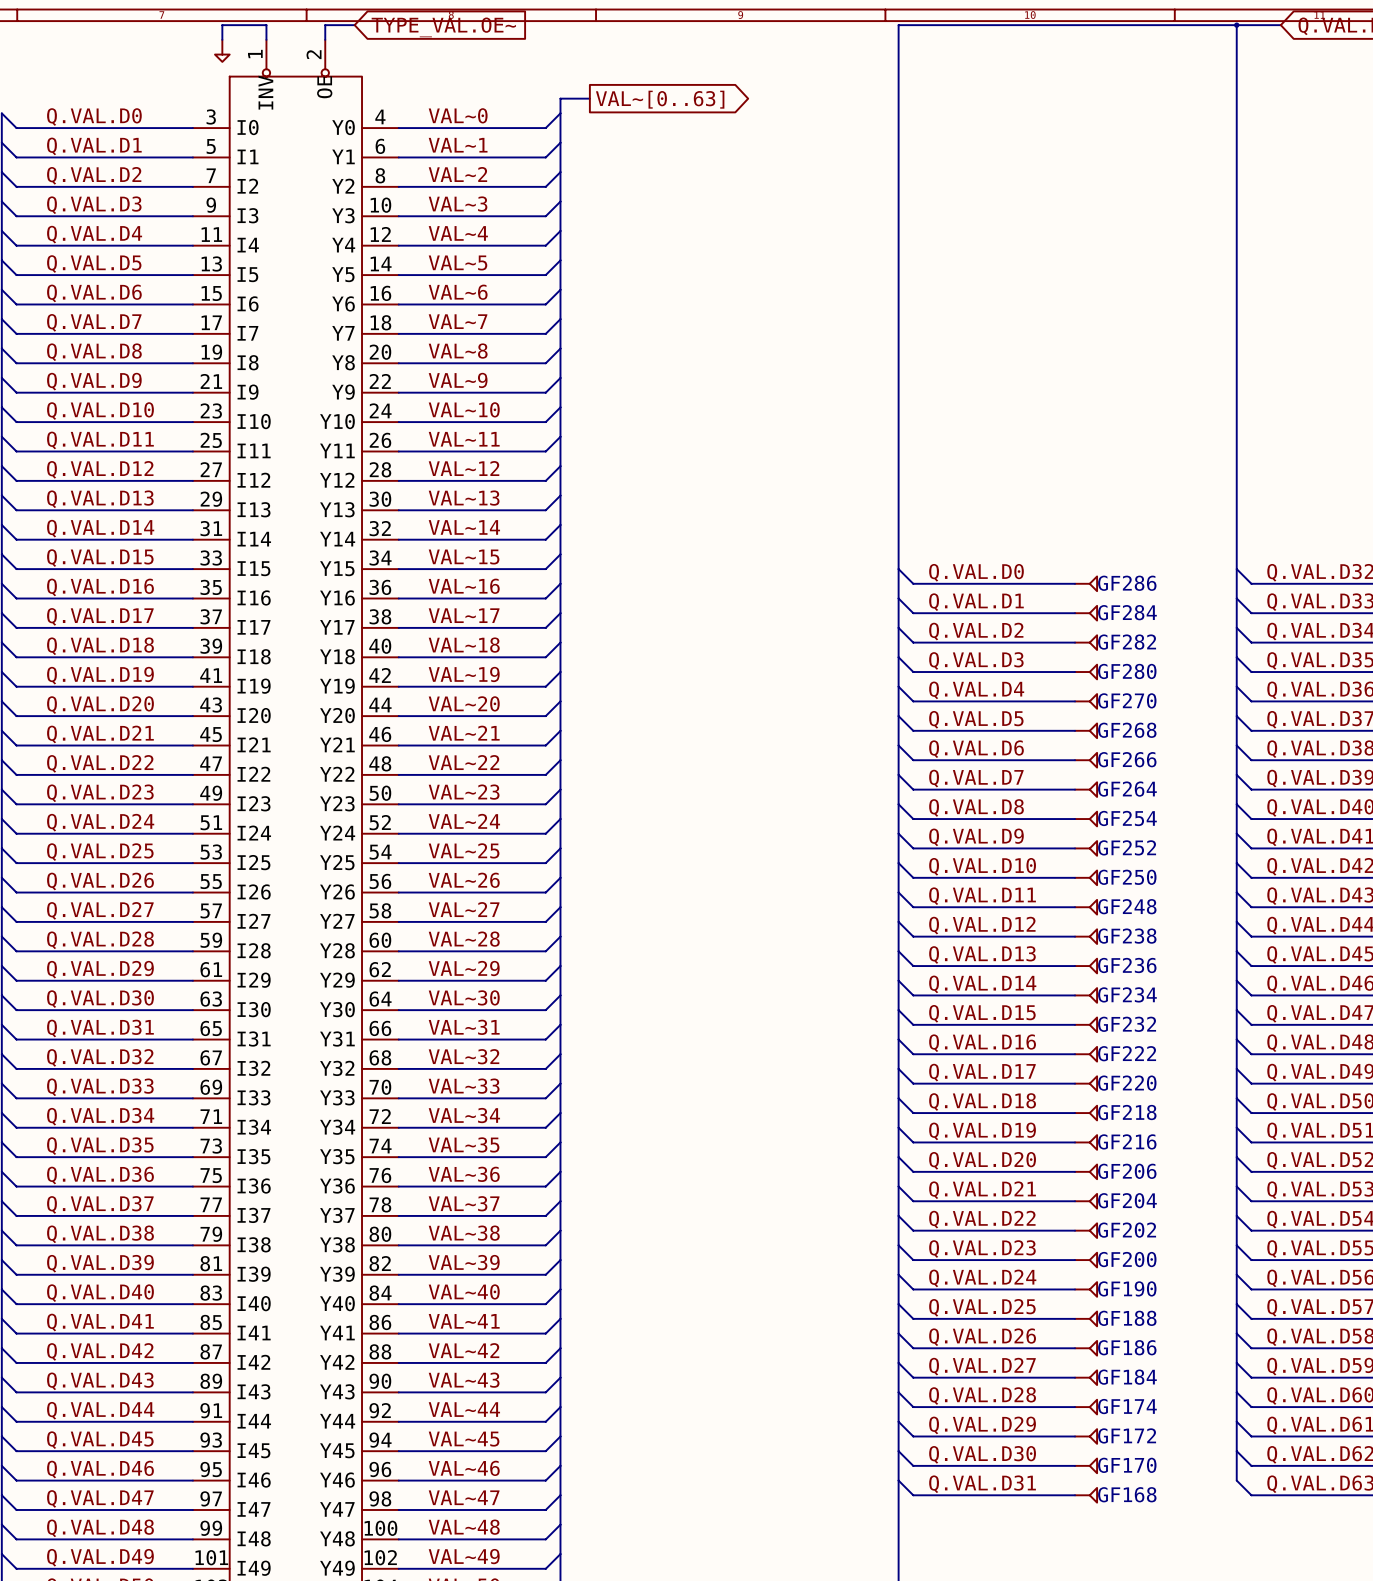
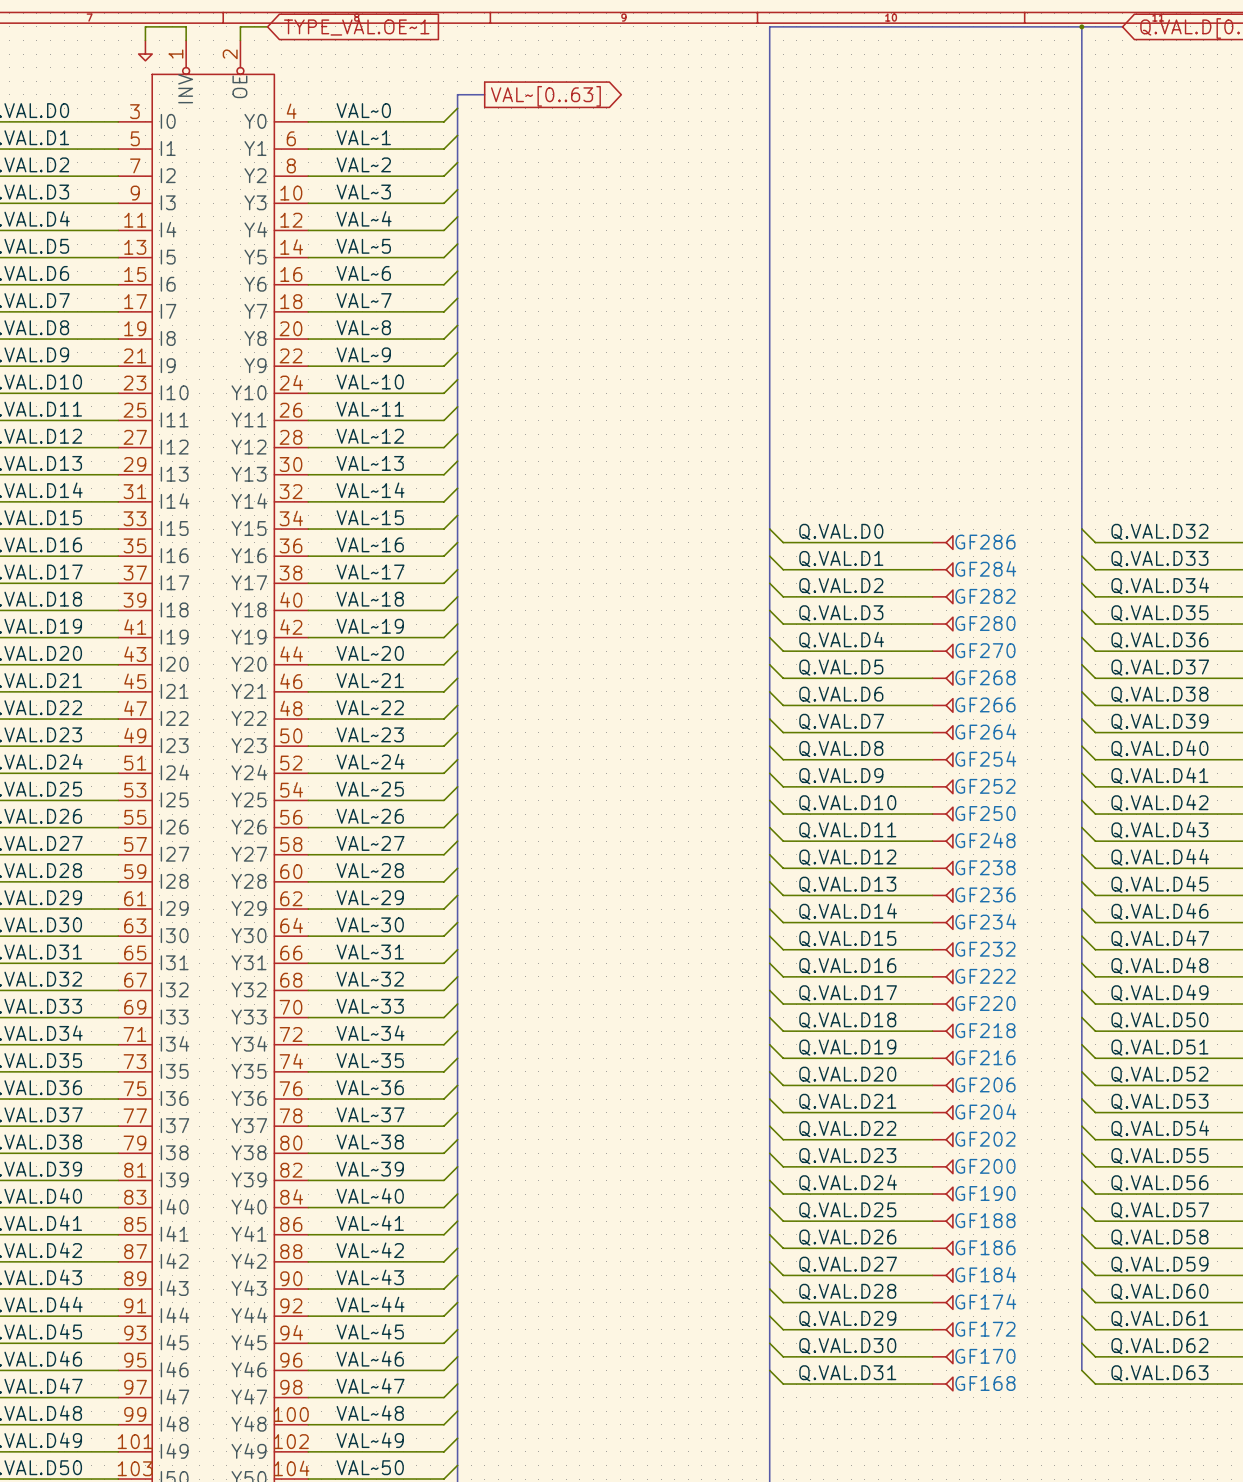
global label: TYPE_VAL.OE~ (443, 27) -> TYPE_VAL.OE~1 (356, 27)

